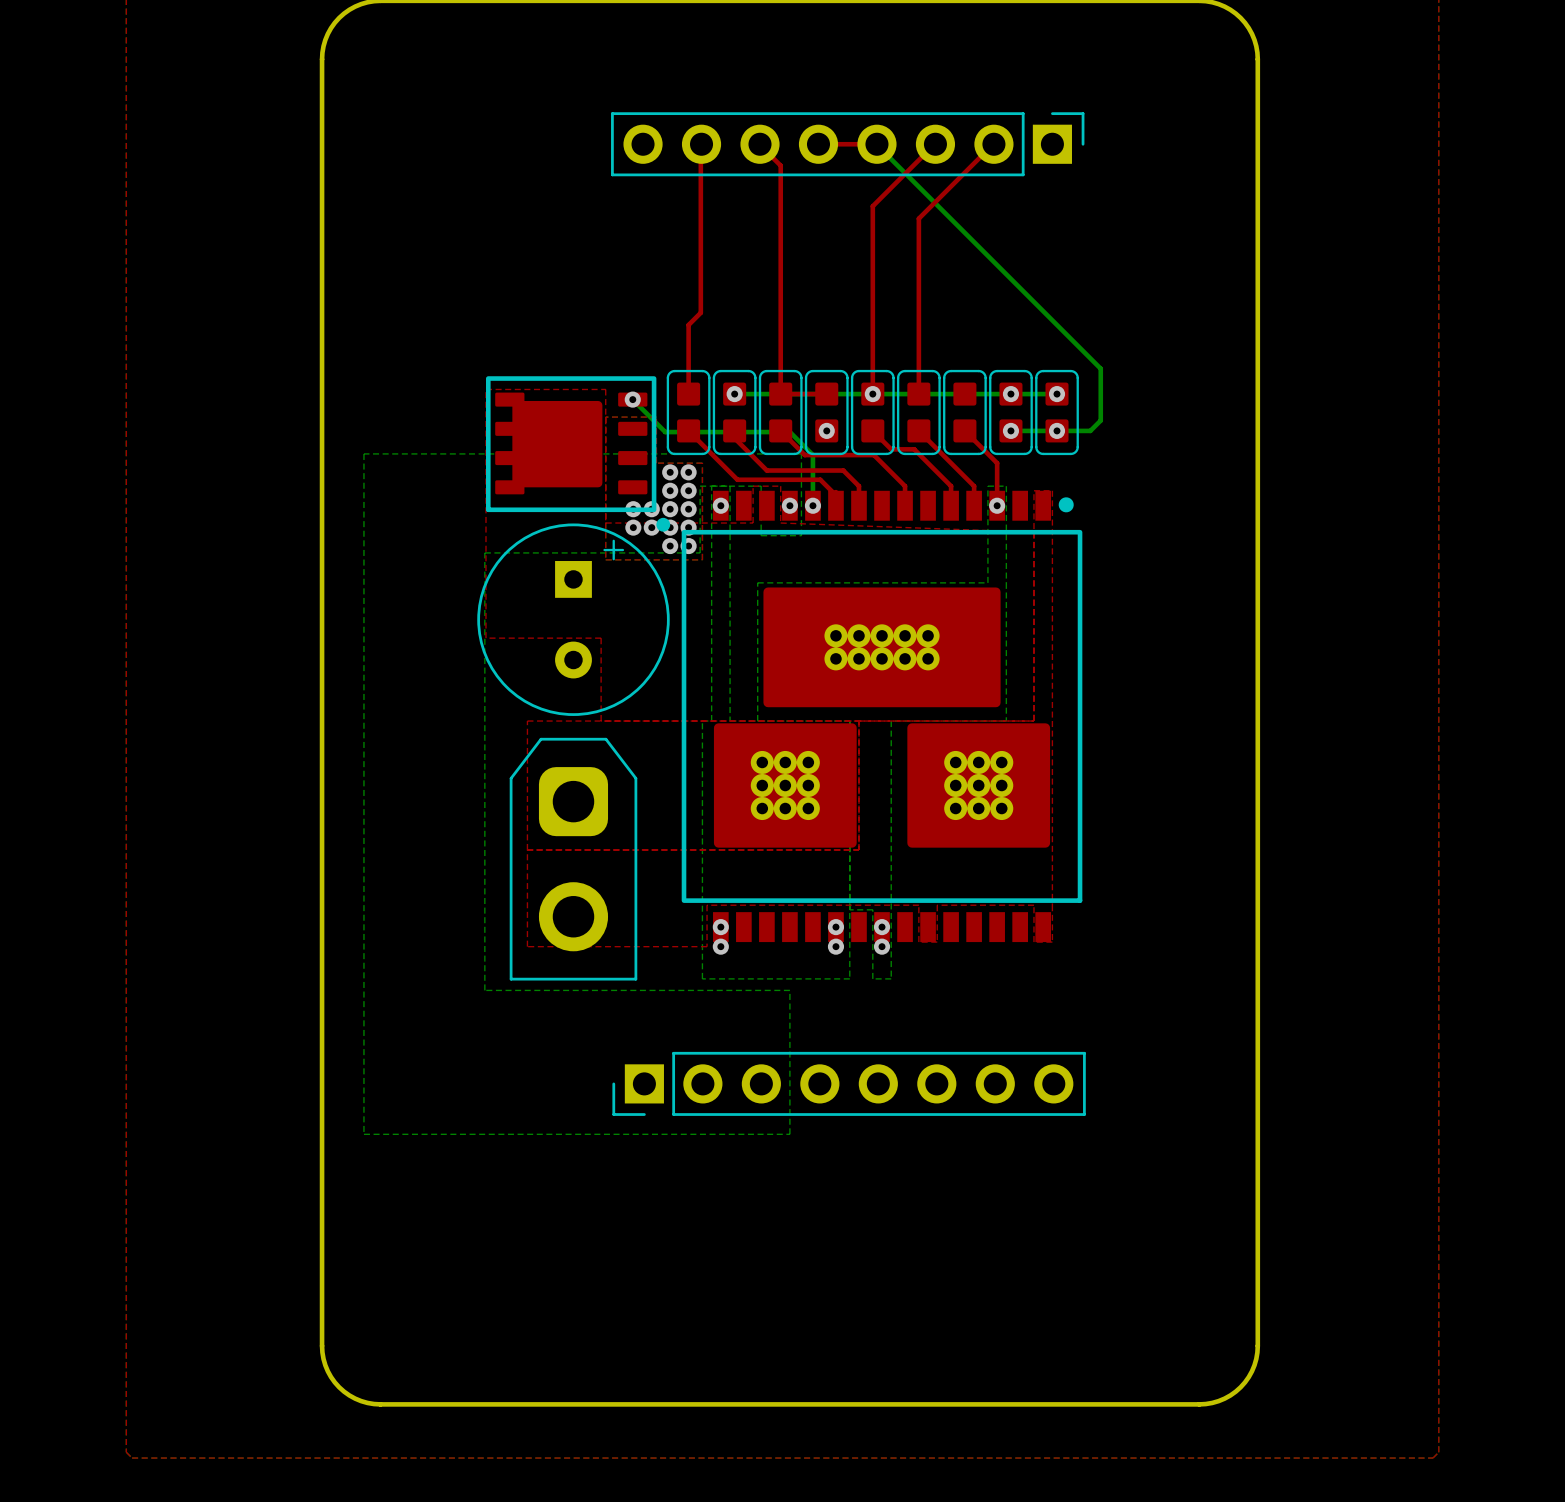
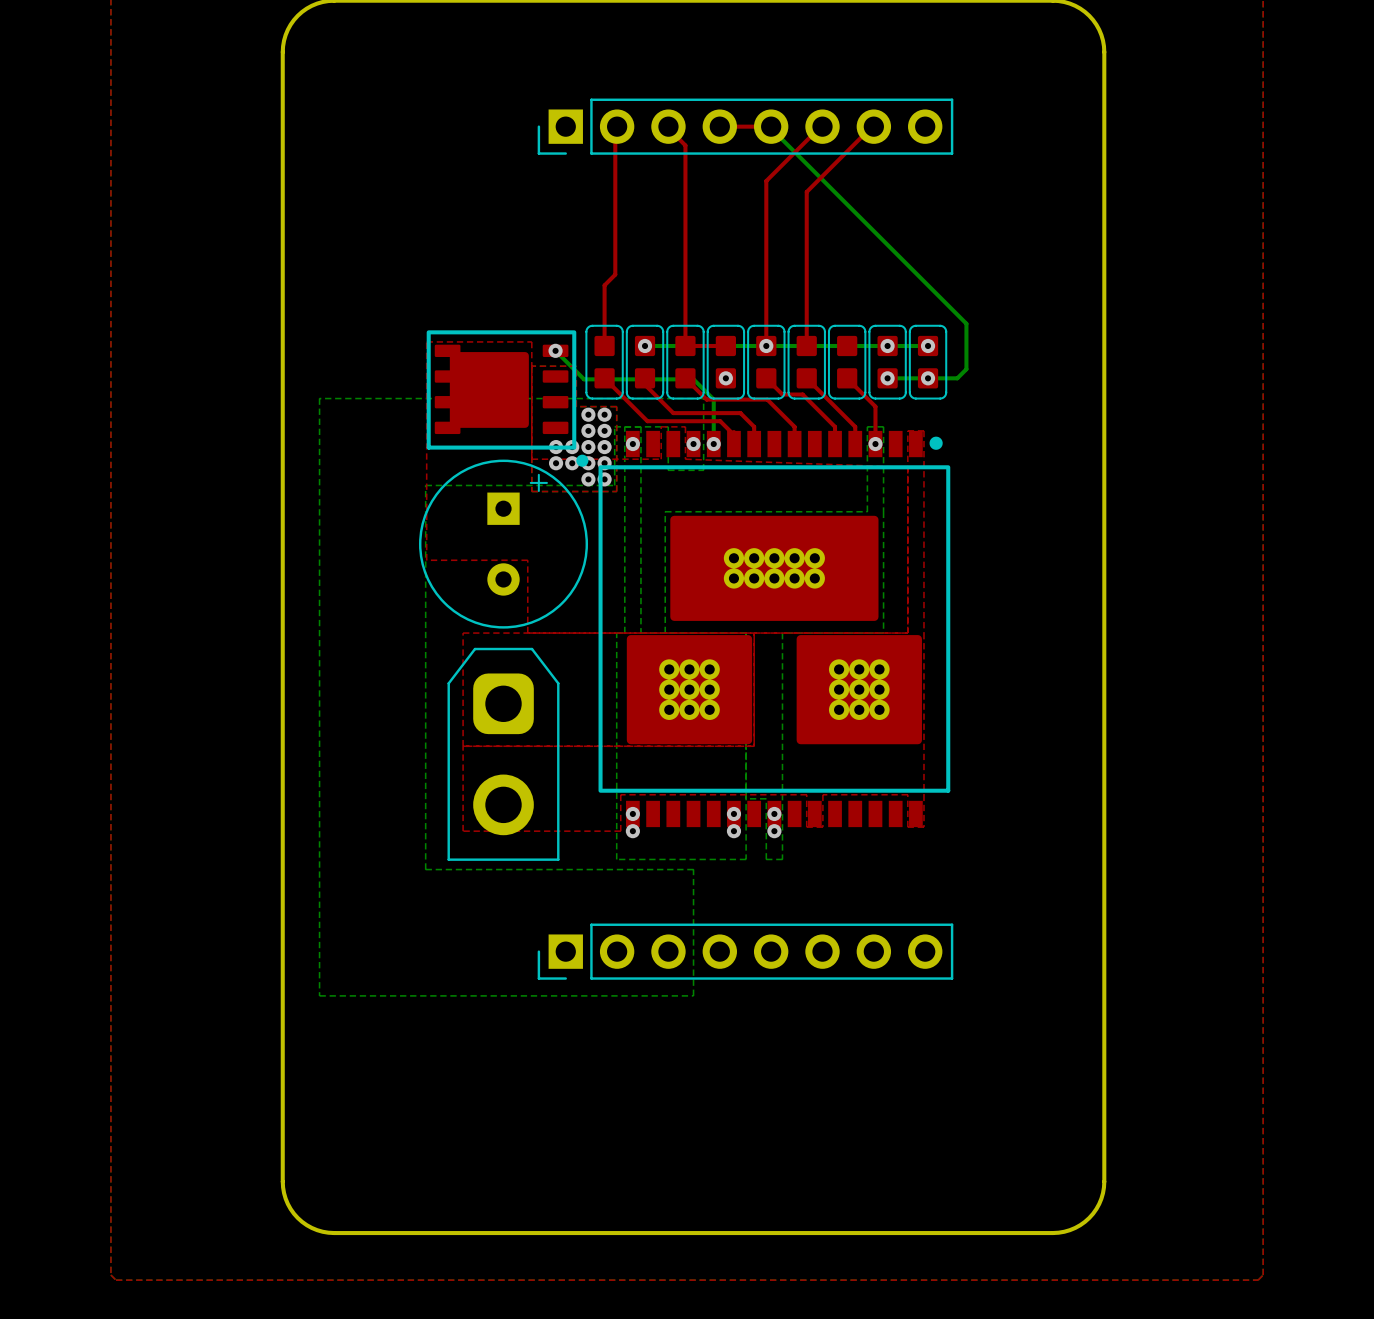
part rotation: 0° (847, 144) -> 180° (745, 126)

